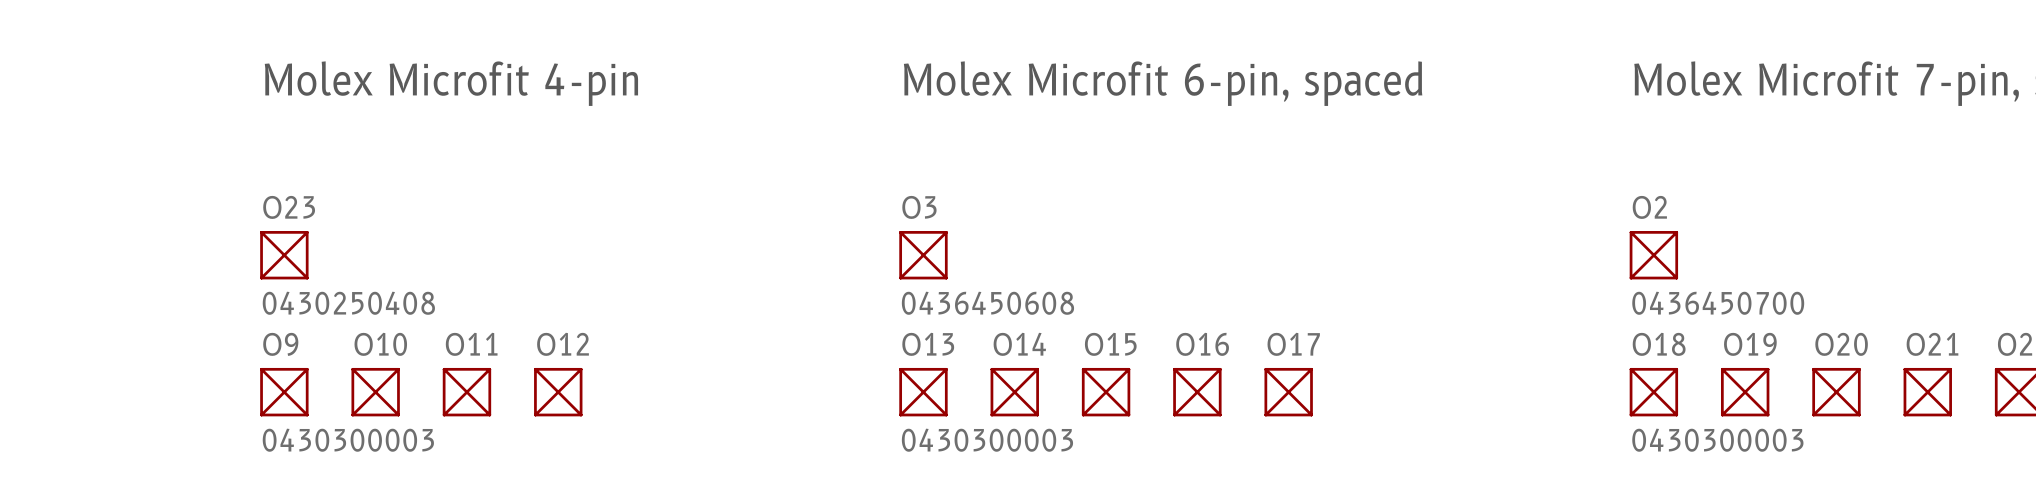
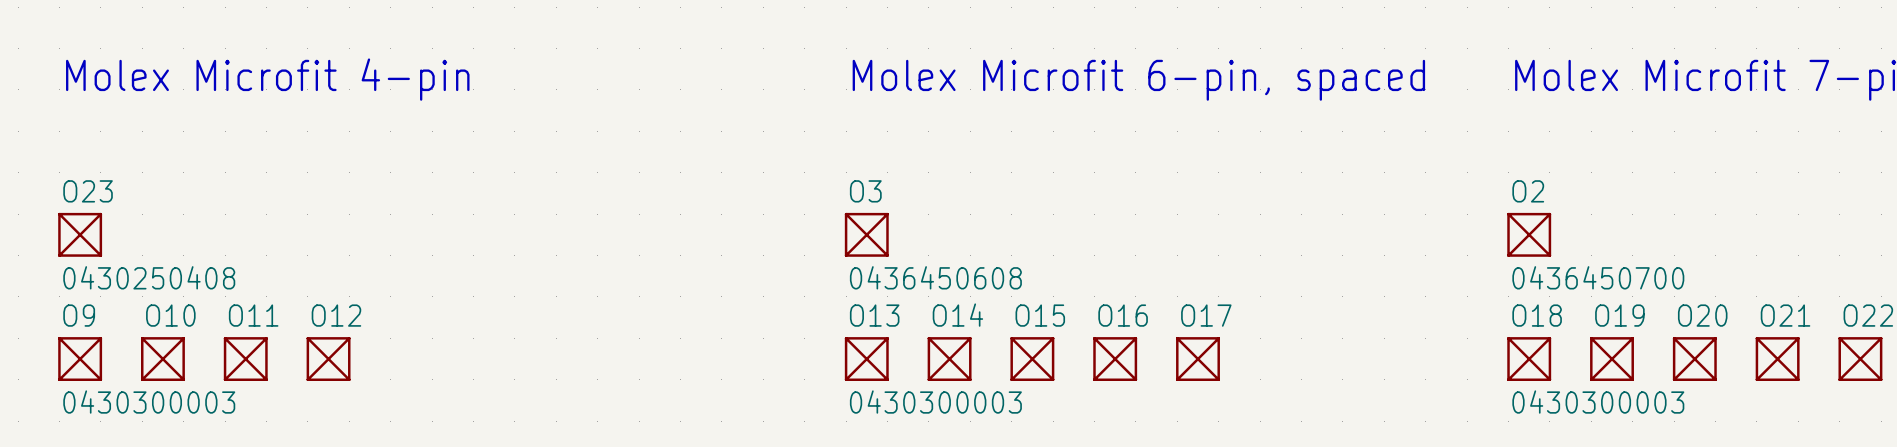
text position: Molex Microfit 4-pin (451, 83) -> Molex Microfit 4-pin (267, 79)
O23 position: (284, 255) -> (80, 234)
O9 position: (284, 392) -> (80, 359)
O10 position: (375, 392) -> (162, 359)
O11 position: (466, 392) -> (245, 359)
O12 position: (558, 392) -> (328, 359)

